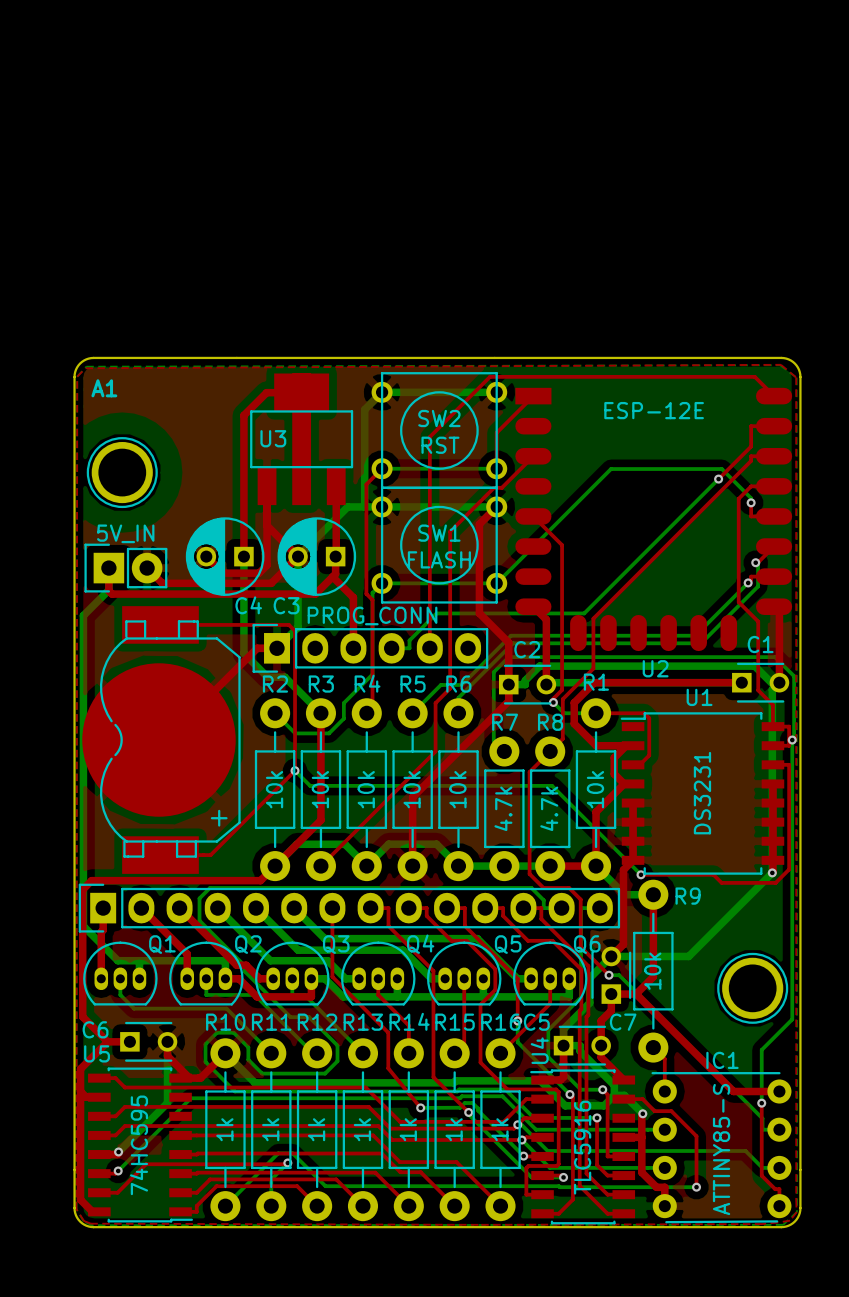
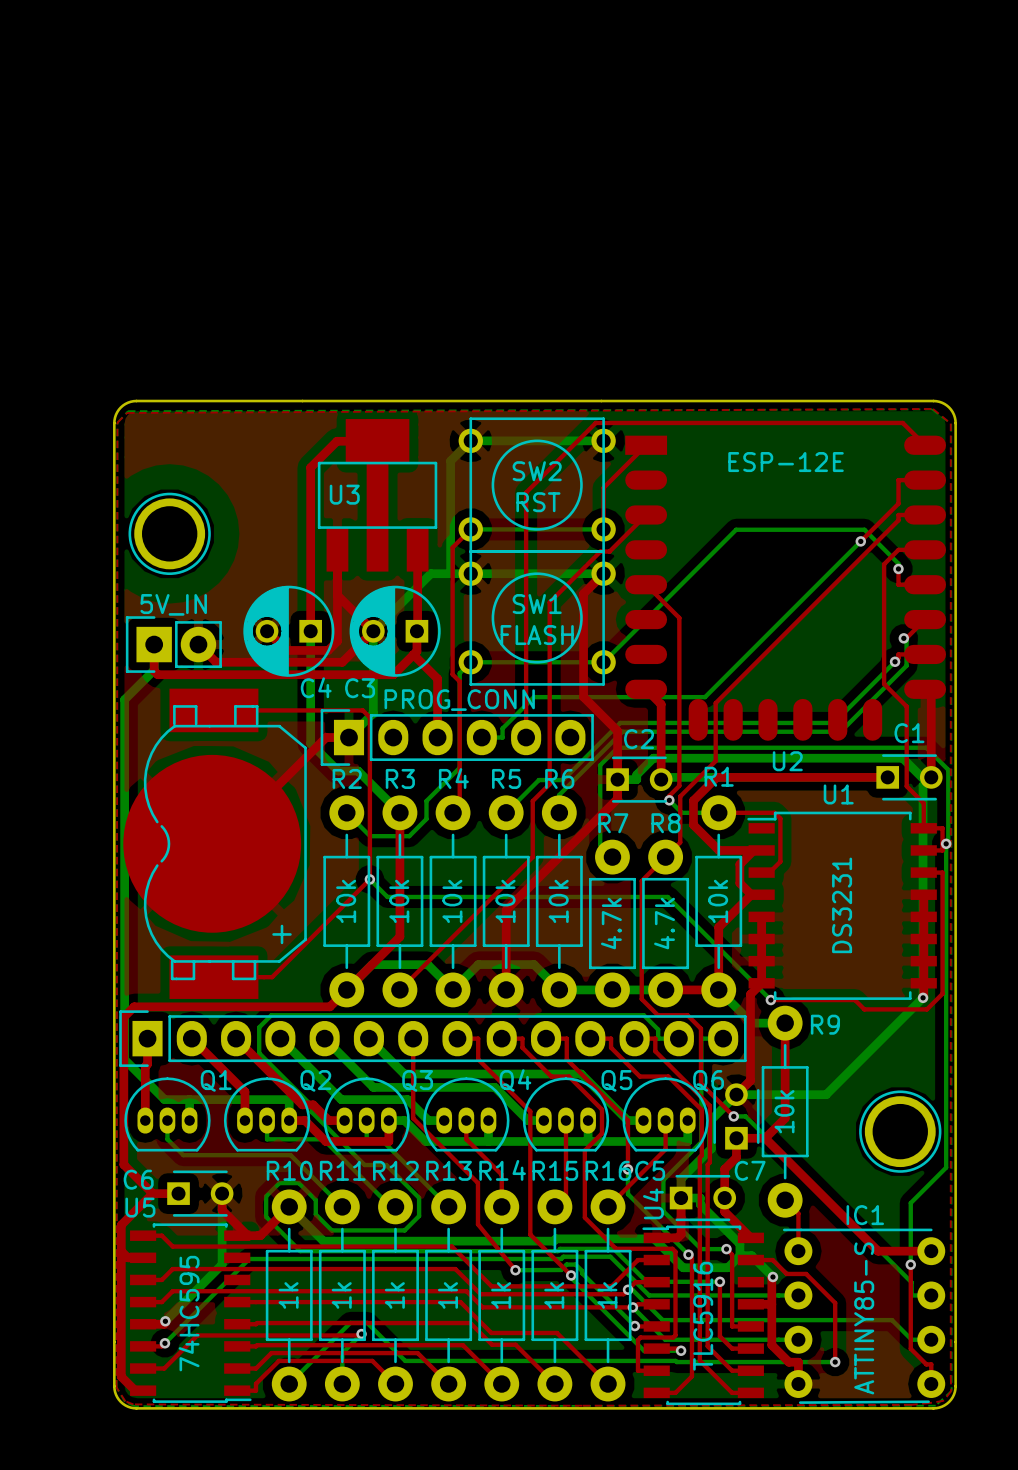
text: A1 (104, 388) -> none

